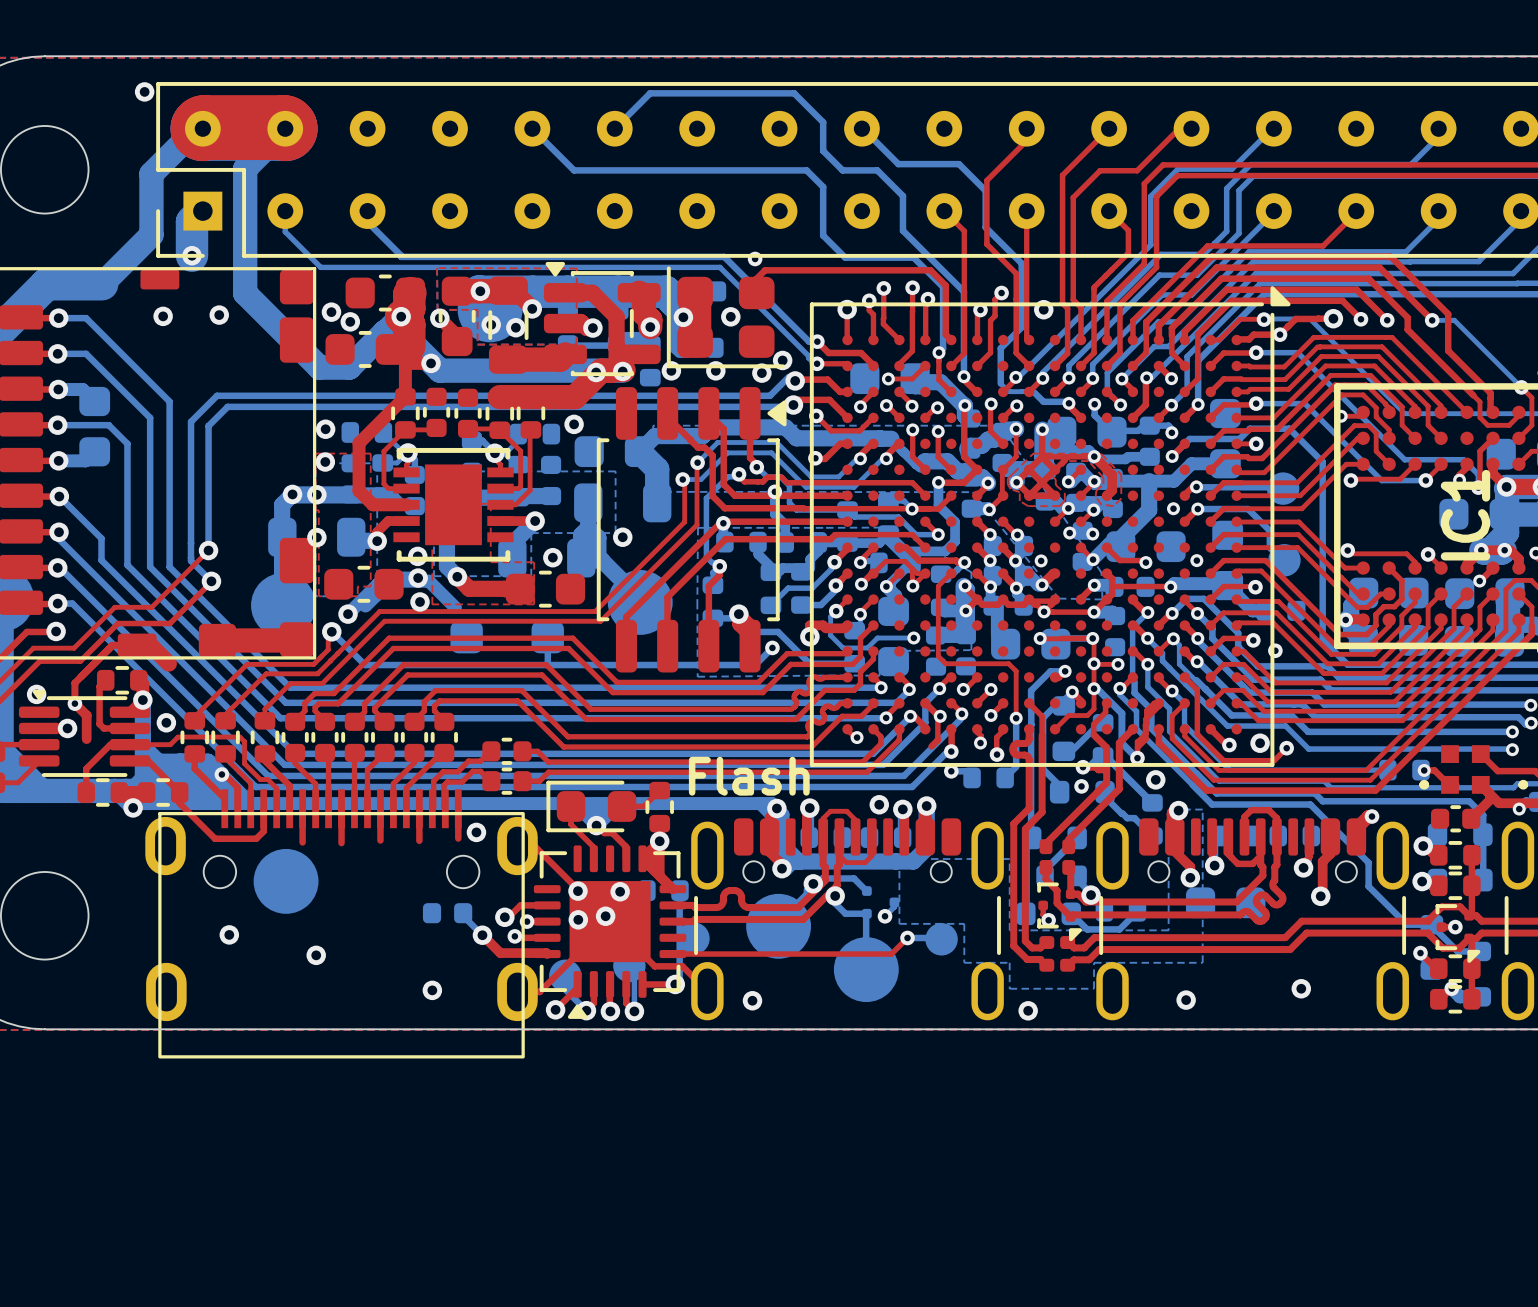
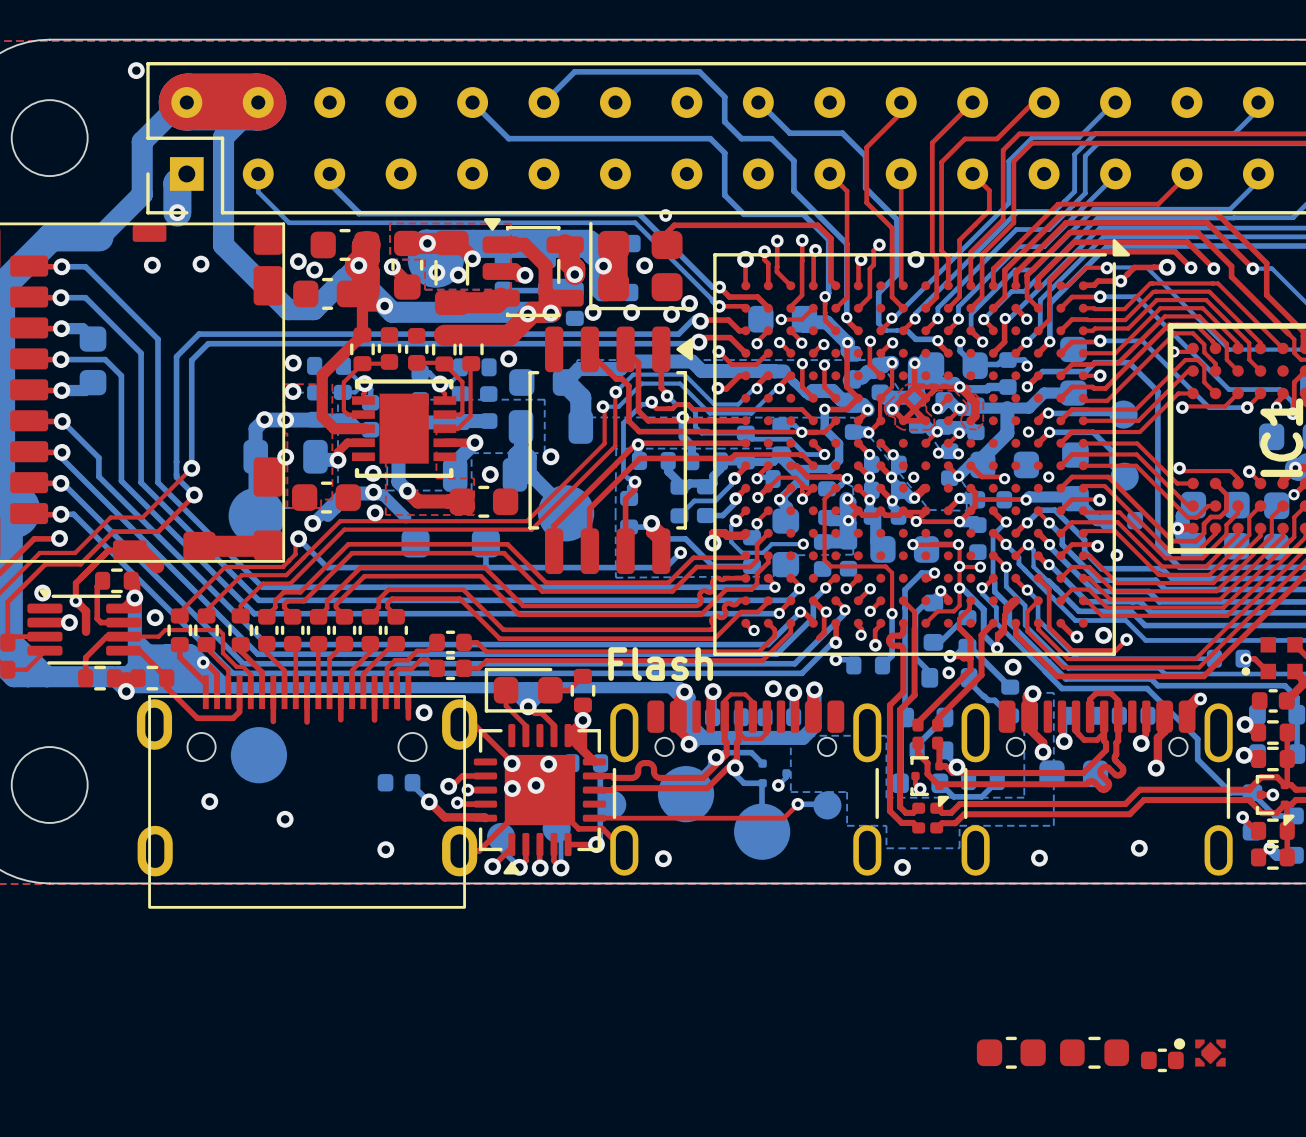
part: none -> (1011, 1052)
part: none -> (1094, 1052)
part: none -> (1199, 1052)
part: none -> (1162, 1060)

